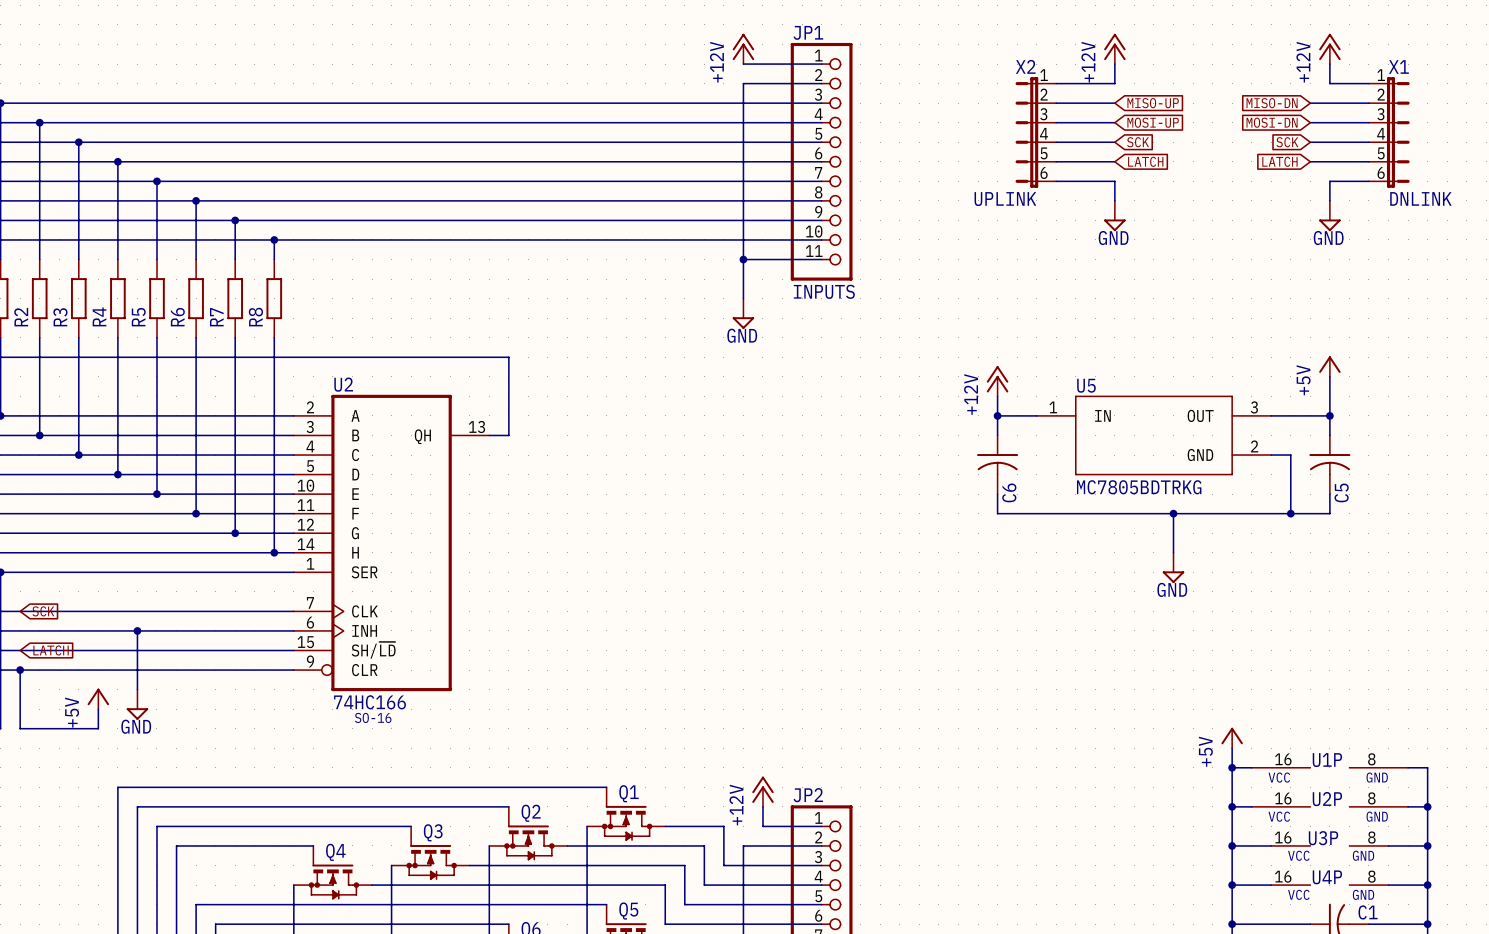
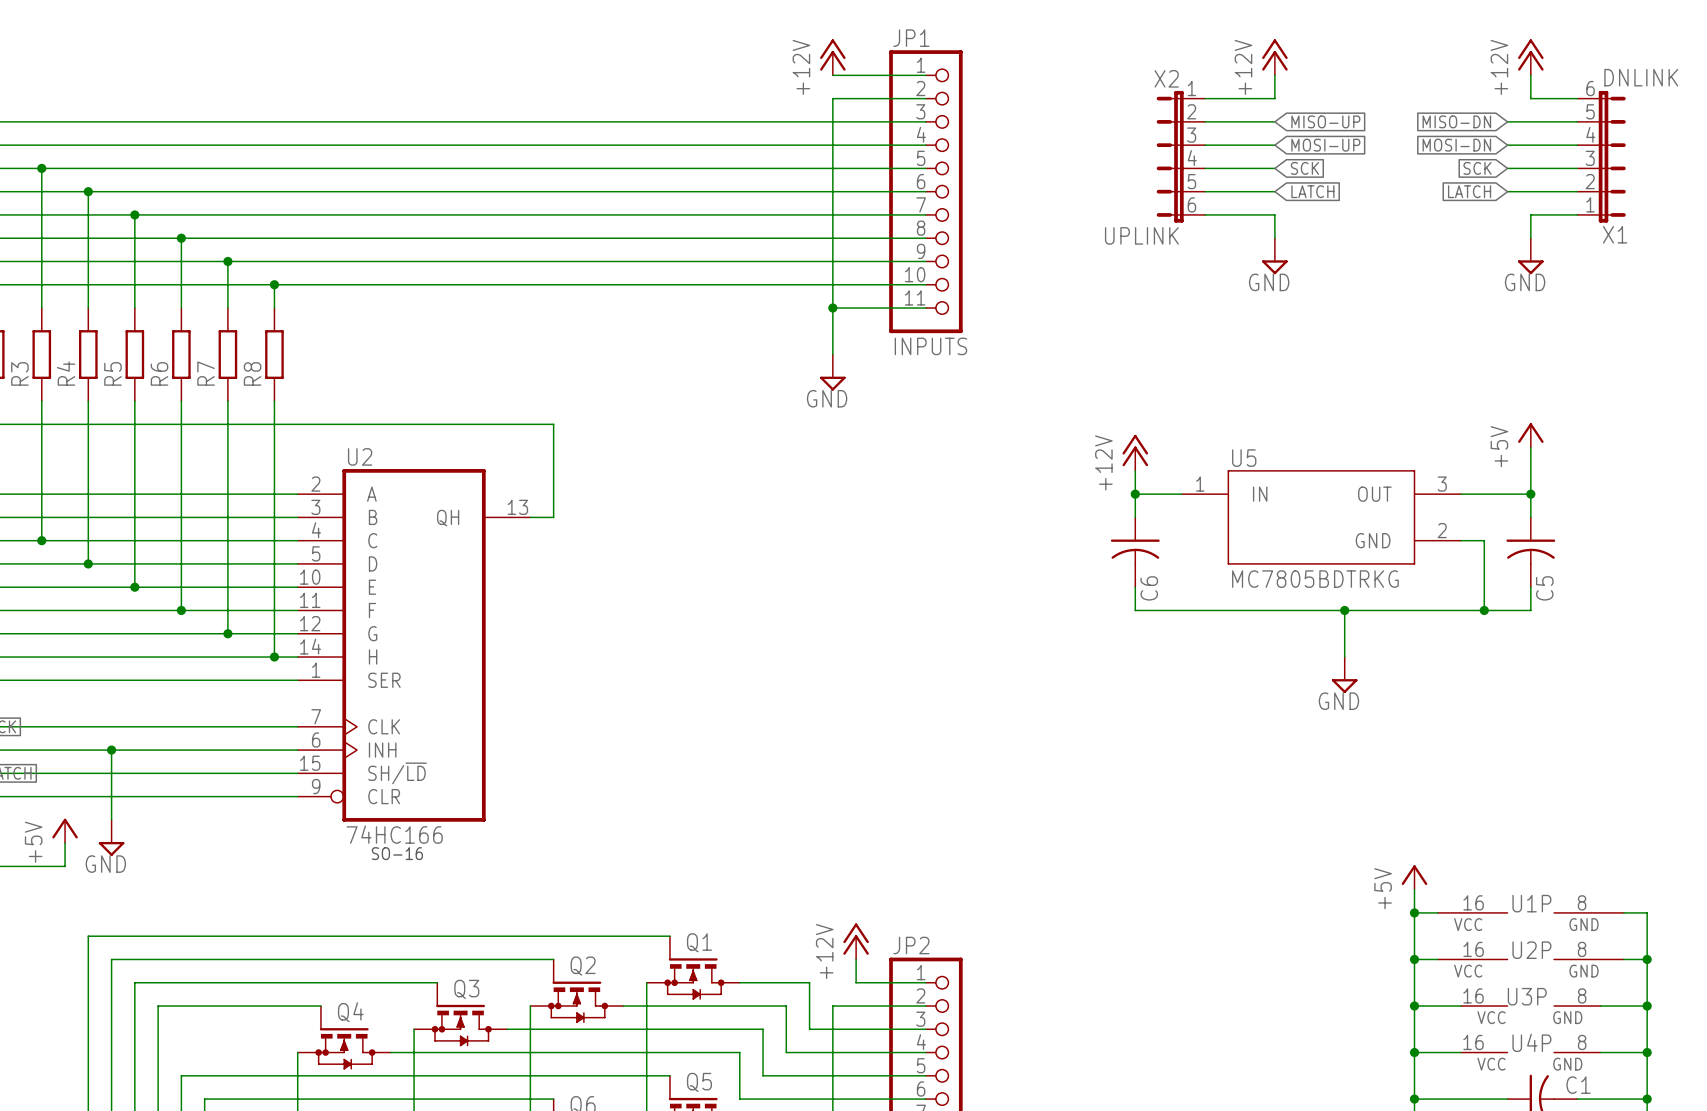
X1 flip: as is (1398, 132) -> up-down (1612, 156)

